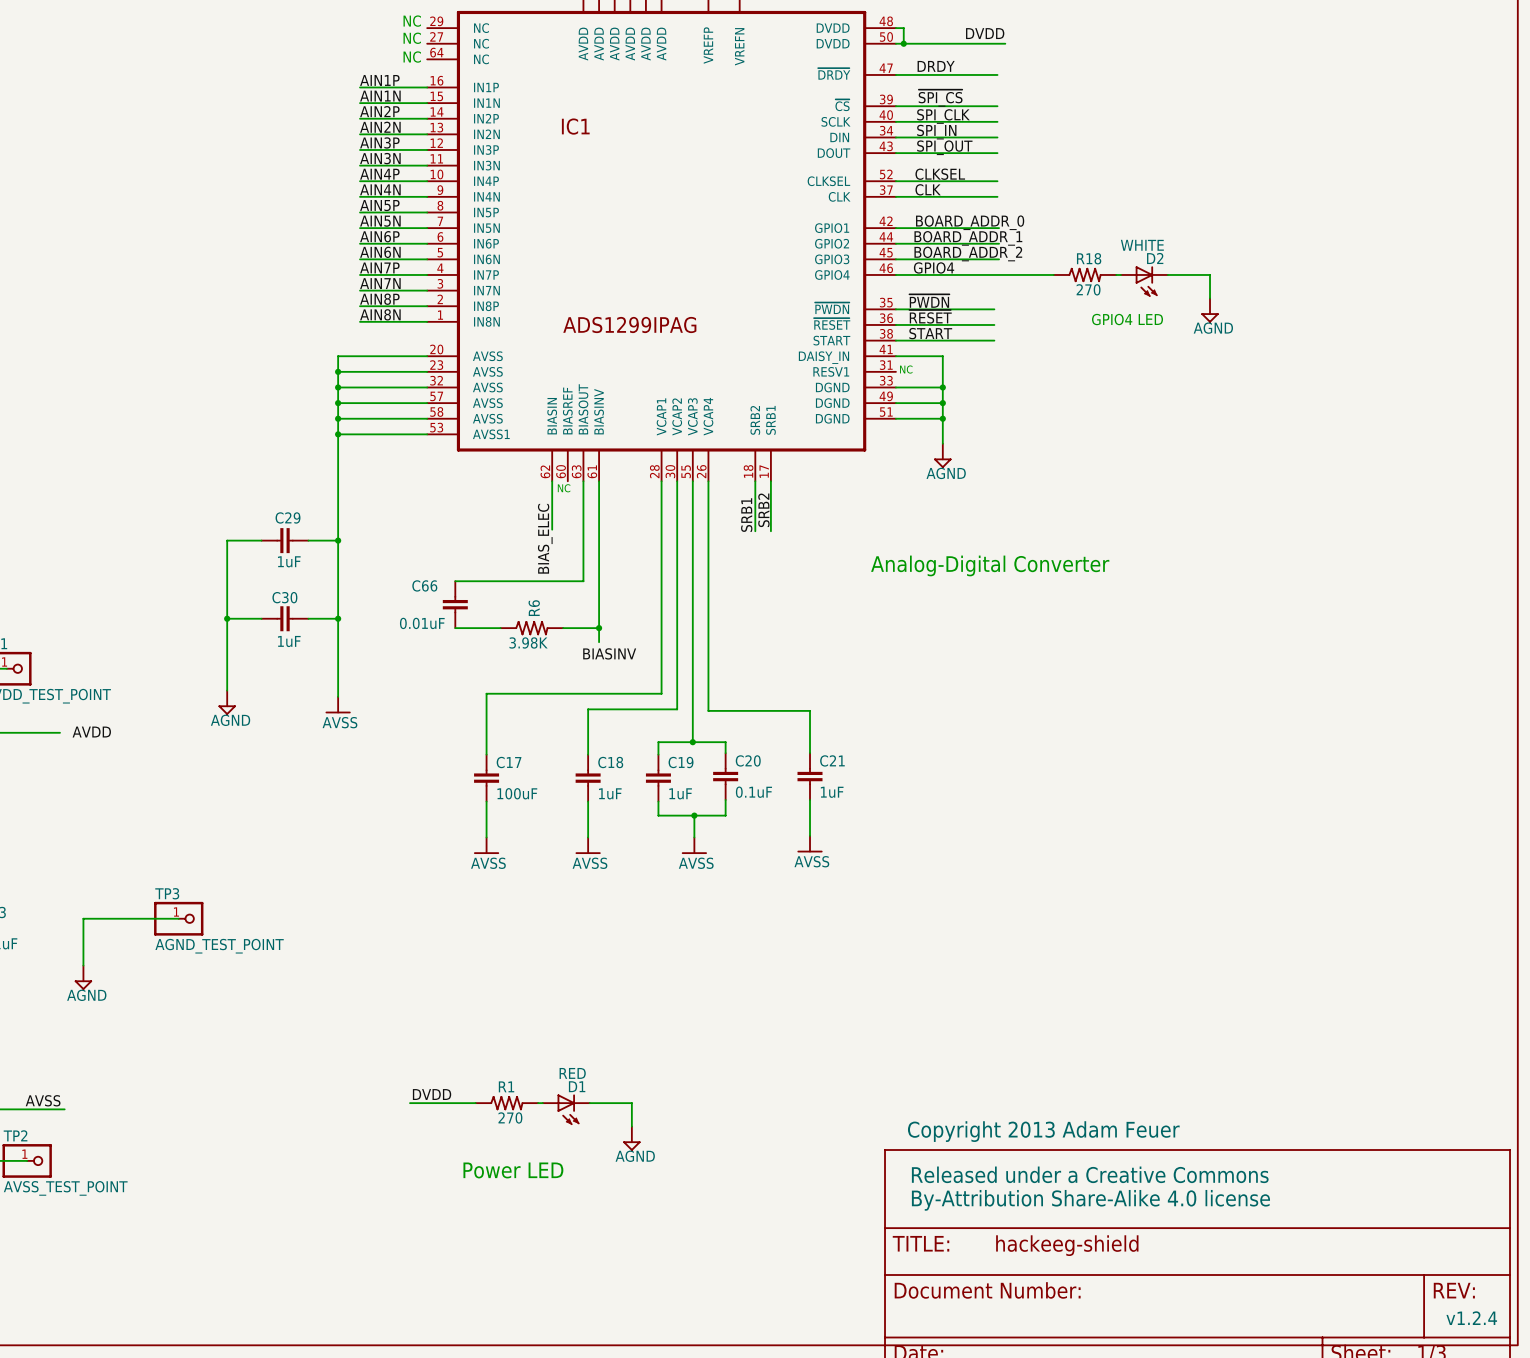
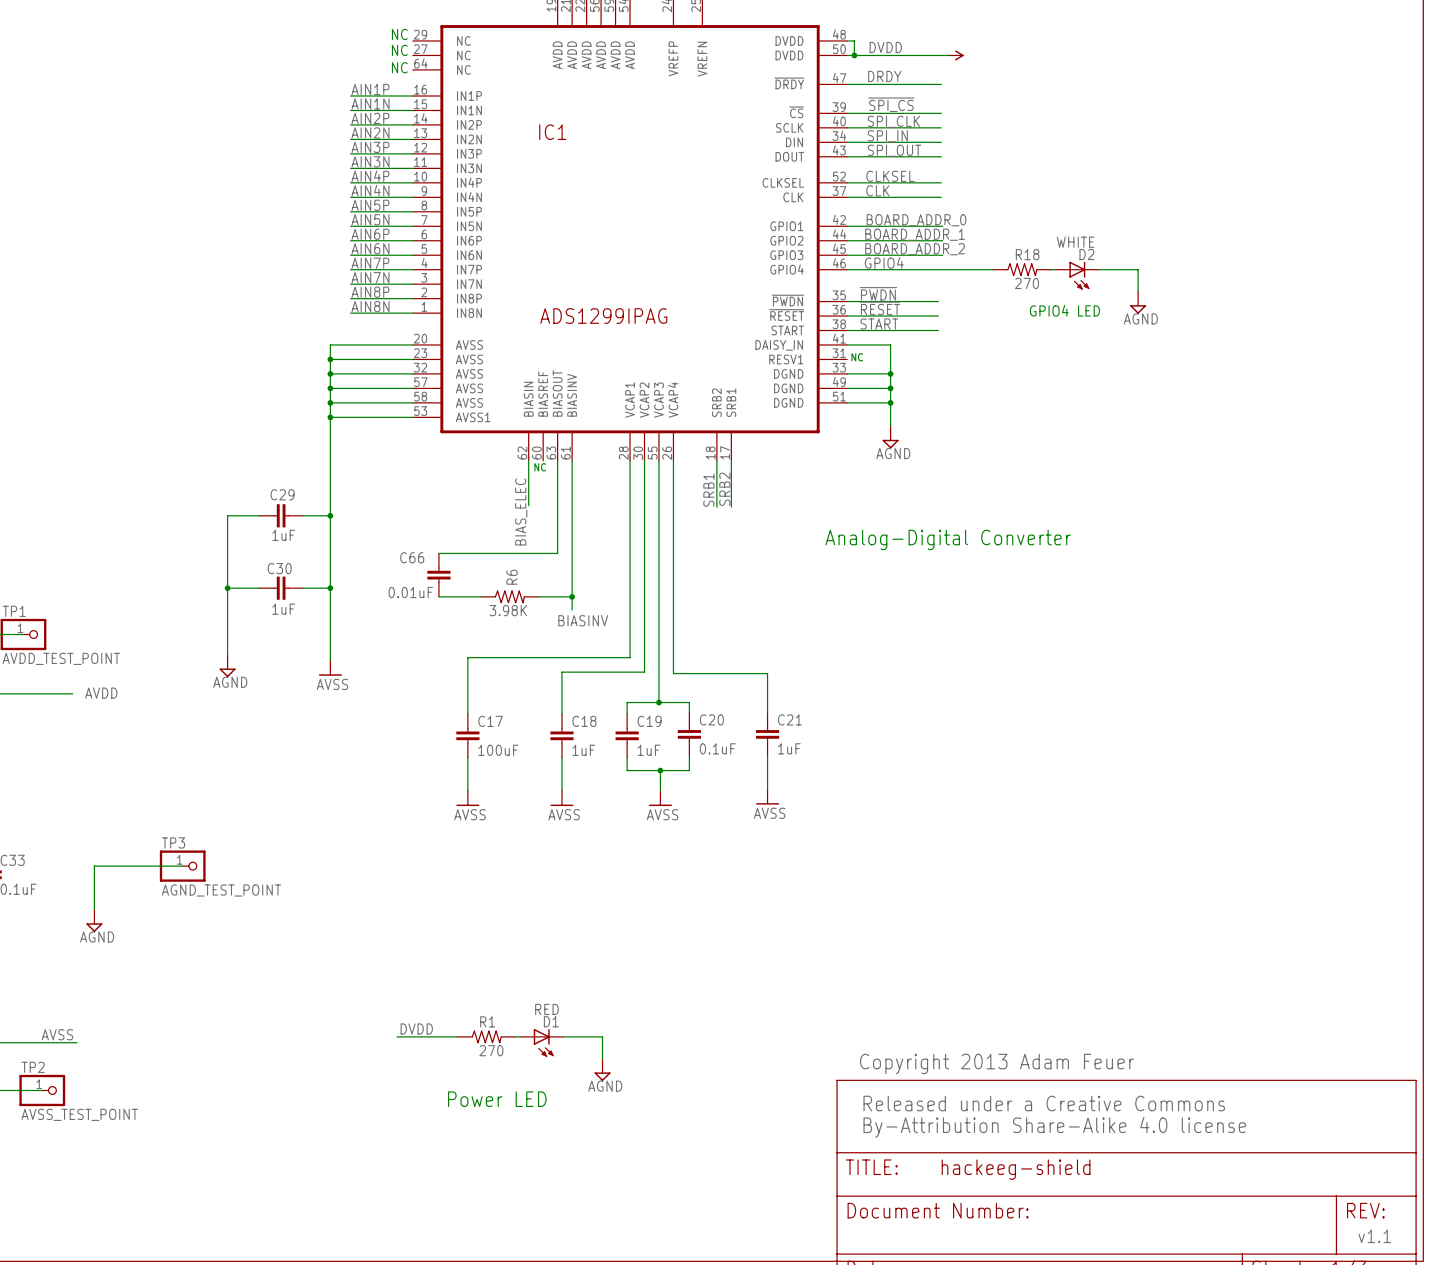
label: DVDD (985, 33) -> none
power symbol: none -> DVDD (956, 55)
text: v1.2.4 (1471, 1318) -> v1.1 (1374, 1236)

